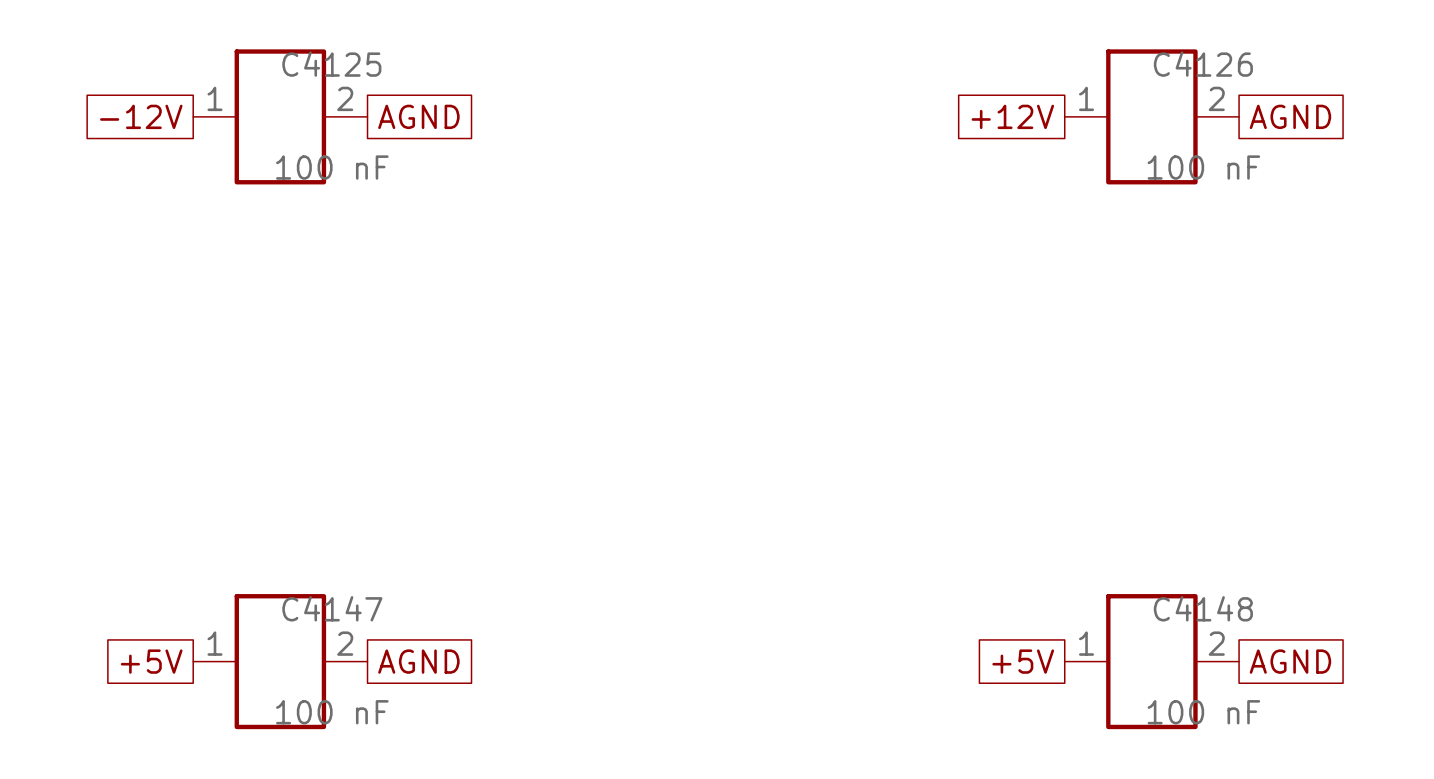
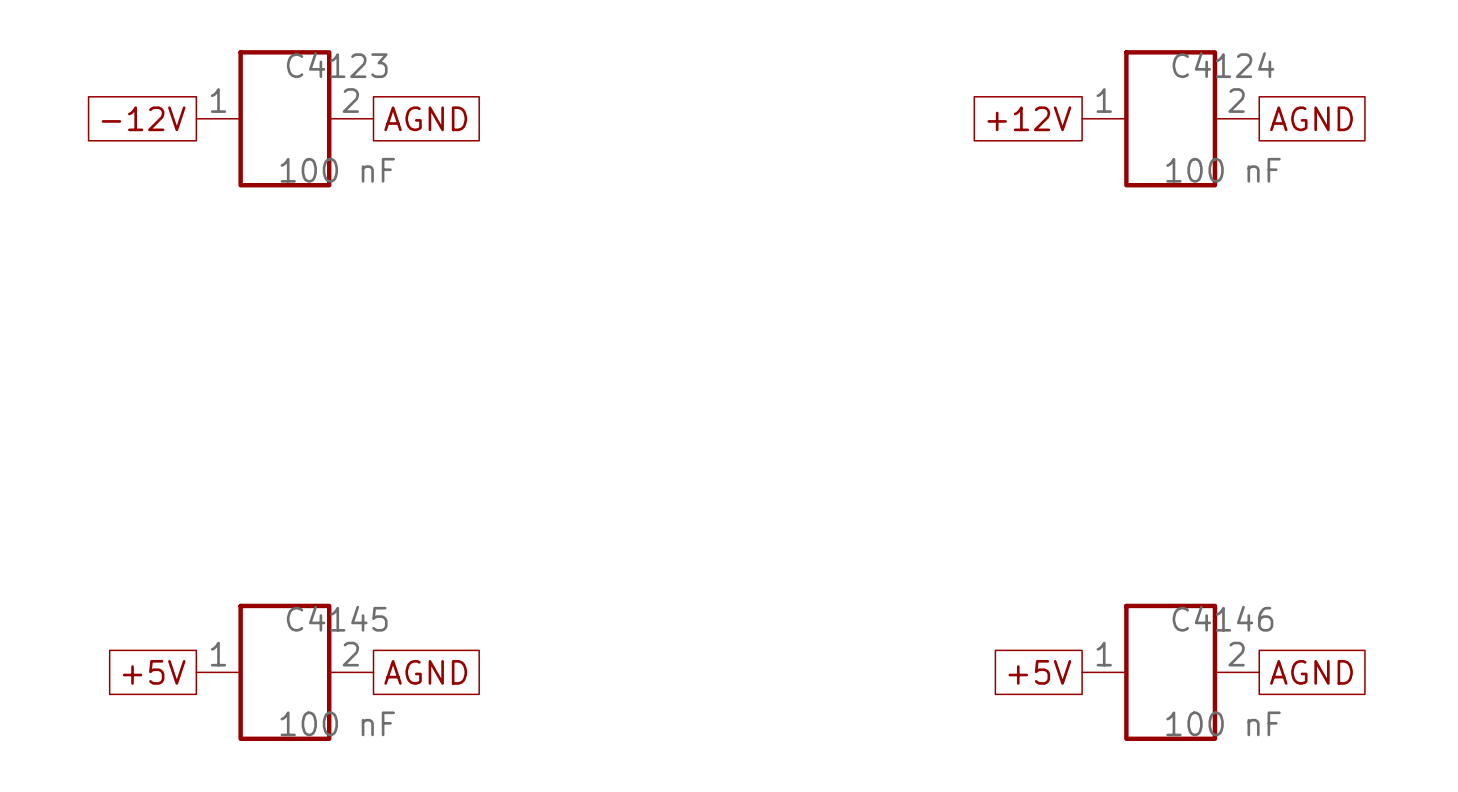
C4125 name: C4125 (331, 64) -> C4123 (337, 65)
C4126 name: C4126 (1203, 64) -> C4124 (1223, 65)
C4147 name: C4147 (332, 608) -> C4145 (337, 618)
C4148 name: C4148 (1203, 608) -> C4146 (1222, 618)

